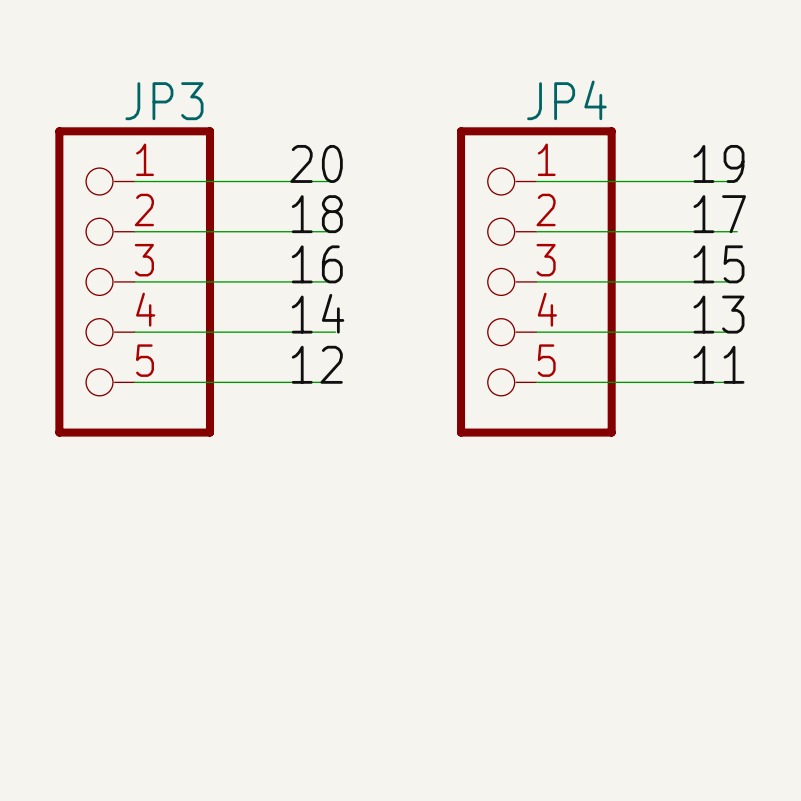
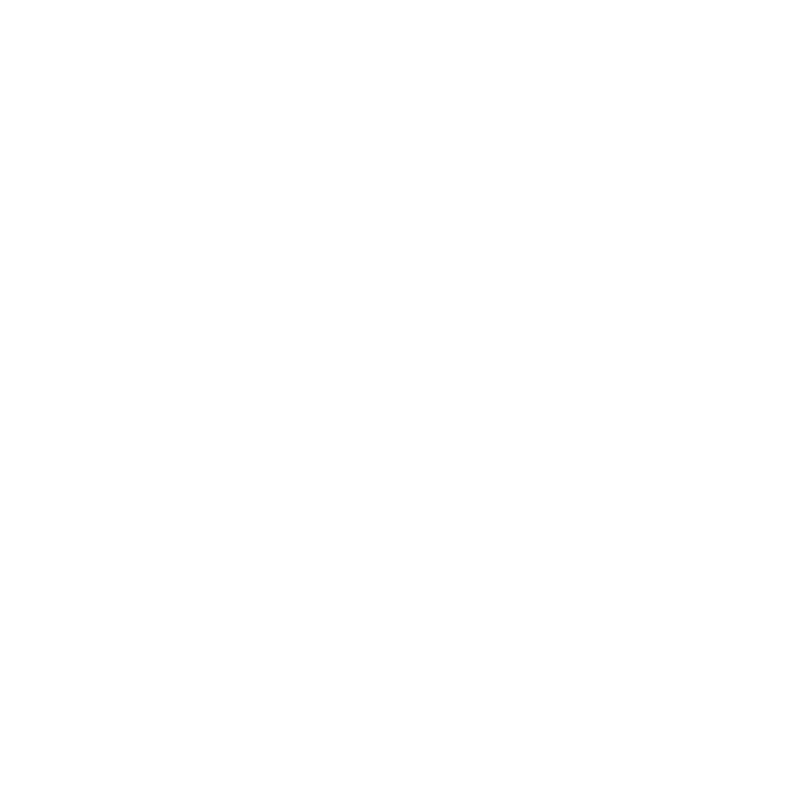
label: 20 (316, 163) -> none
label: 19 (718, 163) -> none
wire: (134, 181) (335, 181) -> none
wire: (536, 181) (737, 181) -> none
label: 18 (317, 214) -> none
label: 17 (719, 214) -> none
wire: (134, 231) (335, 231) -> none
wire: (536, 231) (737, 231) -> none
label: 16 (317, 264) -> none
label: 15 (718, 264) -> none
wire: (134, 281) (335, 281) -> none
JP3: (134, 281) -> none
wire: (536, 281) (737, 281) -> none
JP4: (536, 281) -> none
label: 14 (318, 313) -> none
label: 13 (718, 314) -> none
wire: (134, 332) (335, 332) -> none
wire: (536, 332) (737, 332) -> none
label: 12 (317, 364) -> none
label: 11 (718, 364) -> none
wire: (134, 382) (335, 382) -> none
wire: (536, 382) (737, 382) -> none

